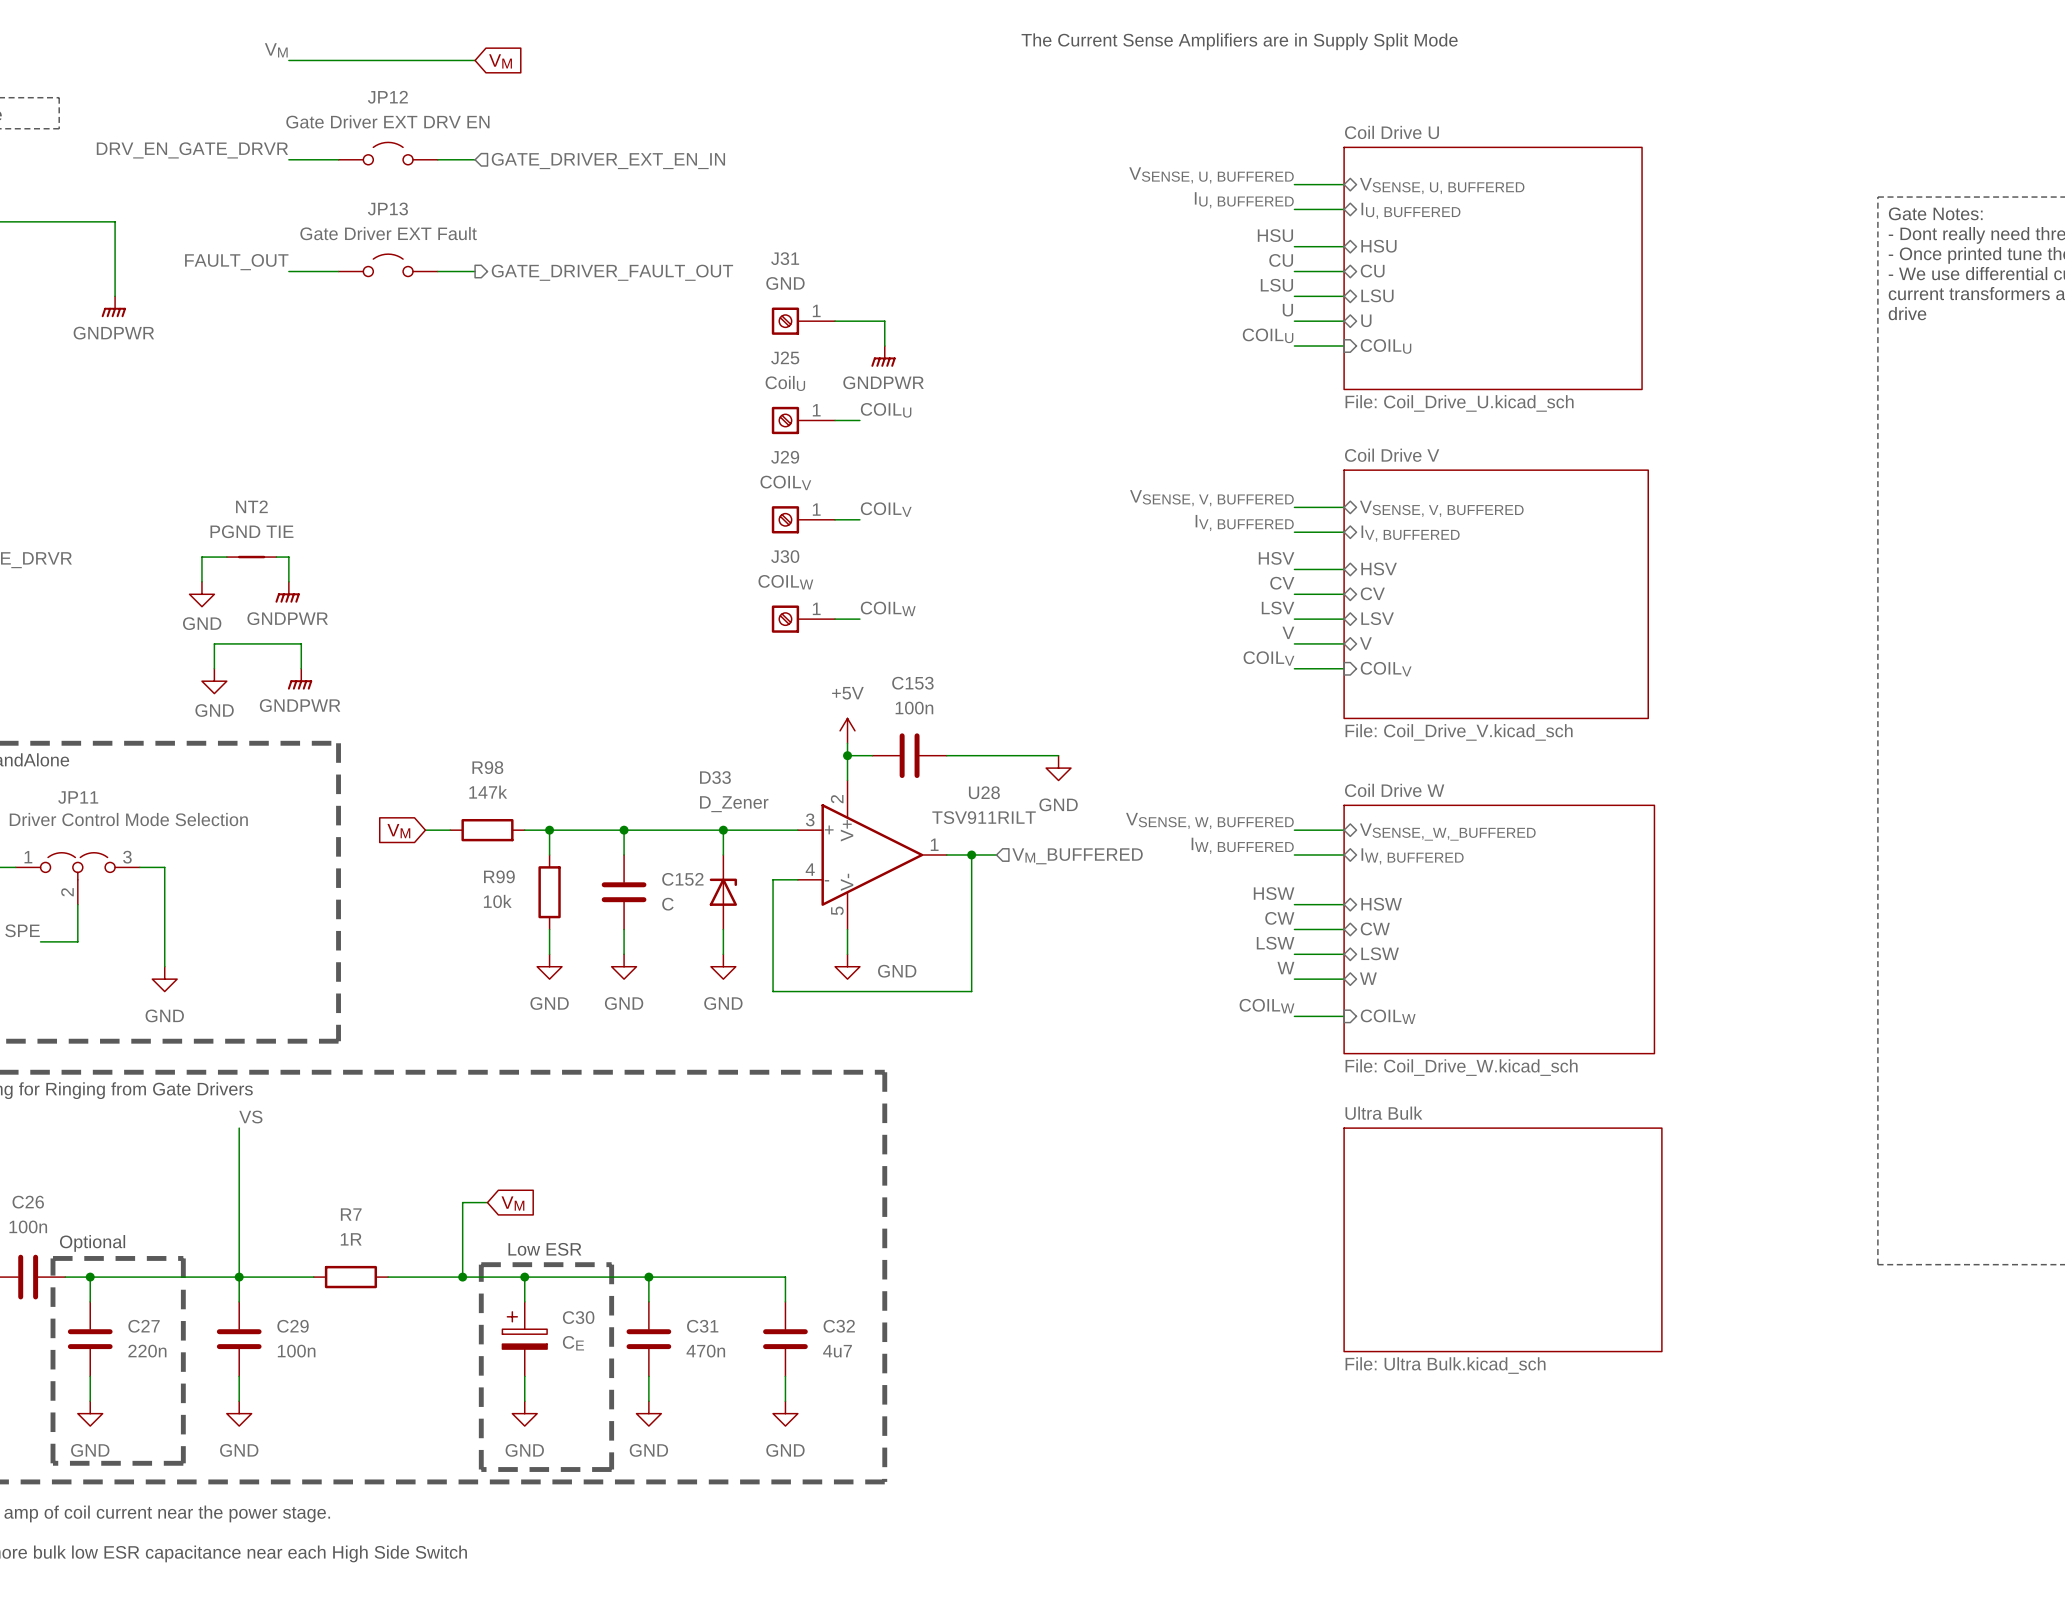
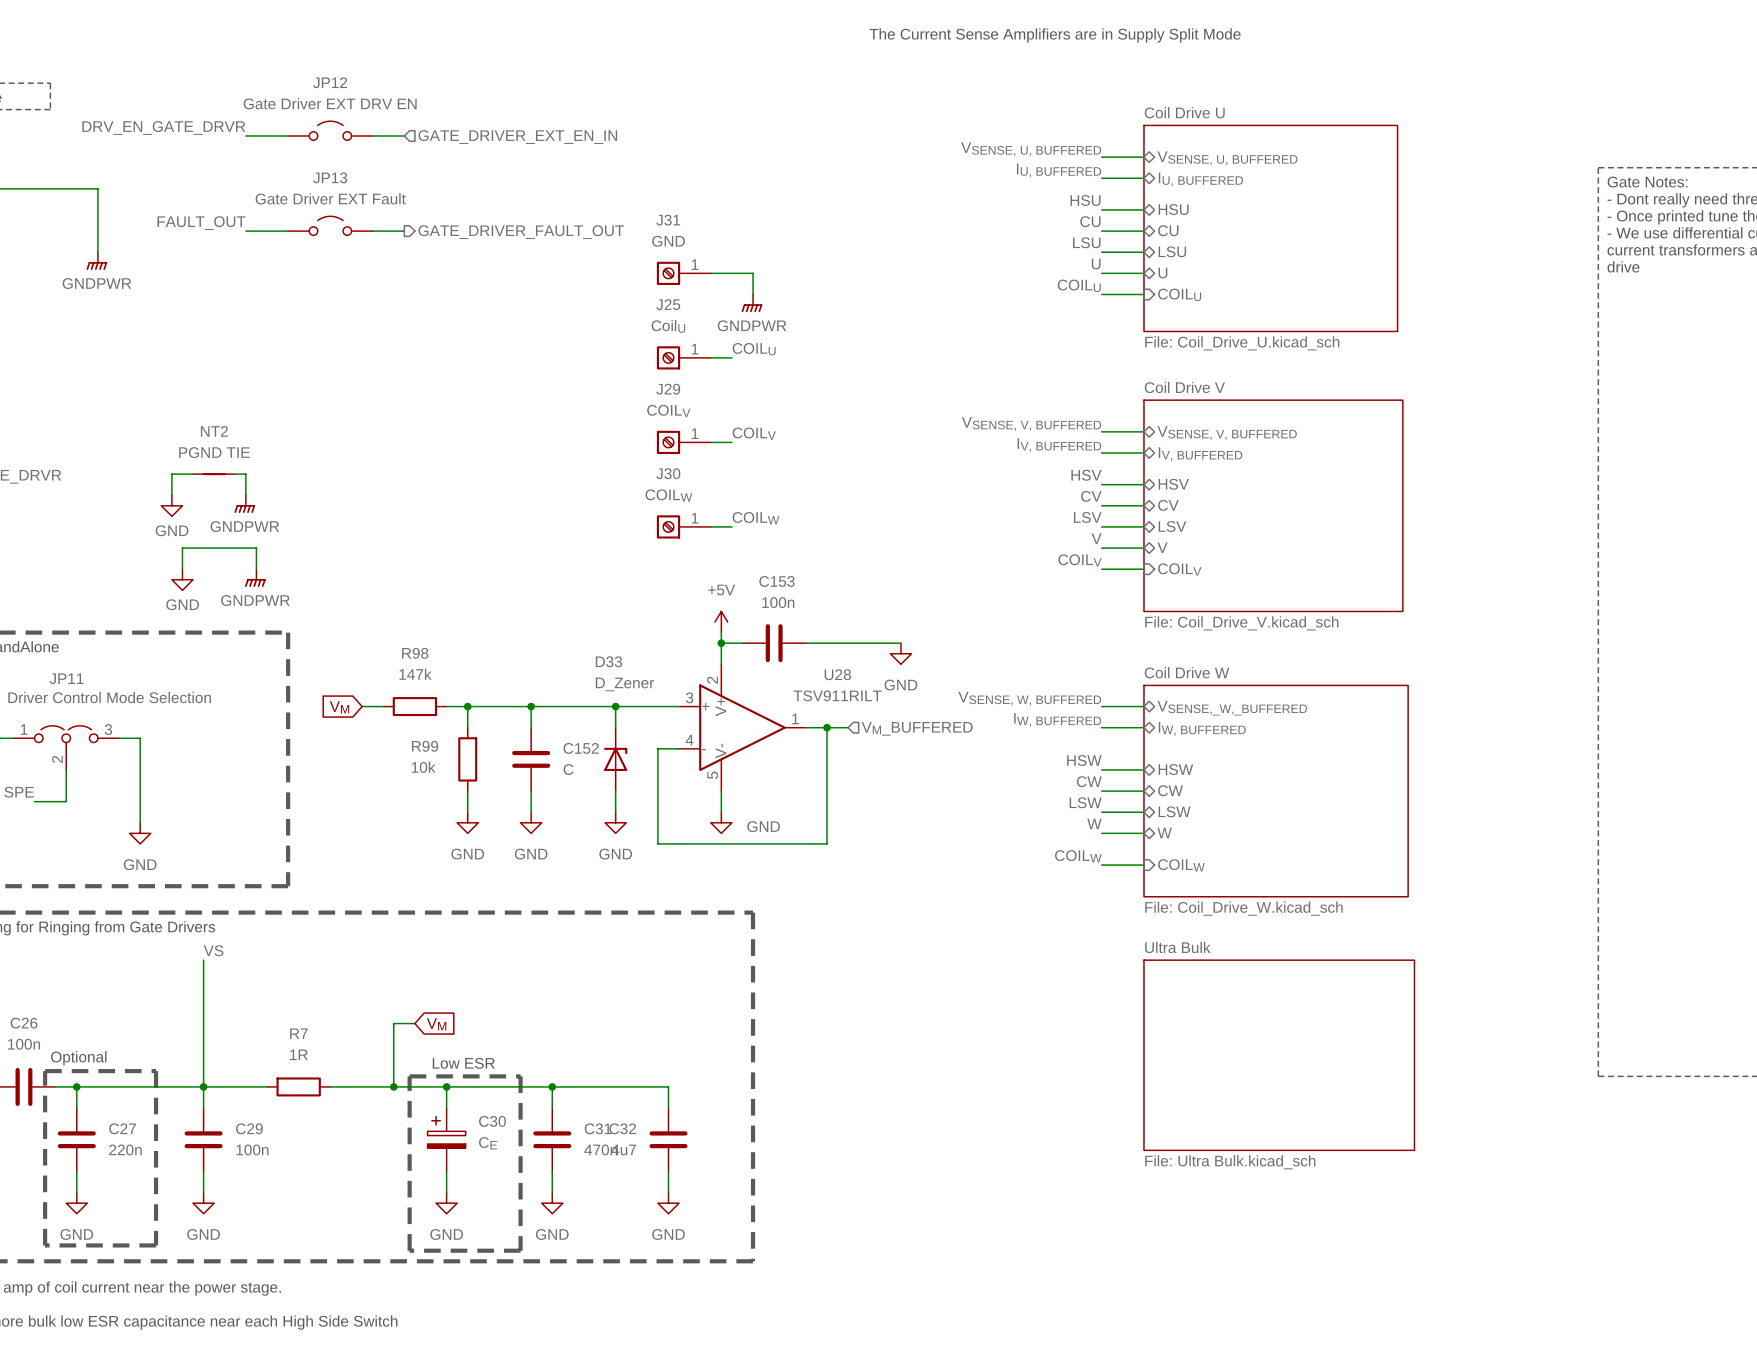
label: VM (276, 50) -> none
wire: (288, 60) (475, 60) -> none
global label: VM (500, 61) -> none
C32 name position: C32 (839, 1326) -> C32 (622, 1128)
C32 value position: 4u7 (837, 1351) -> 4u7 (623, 1150)

